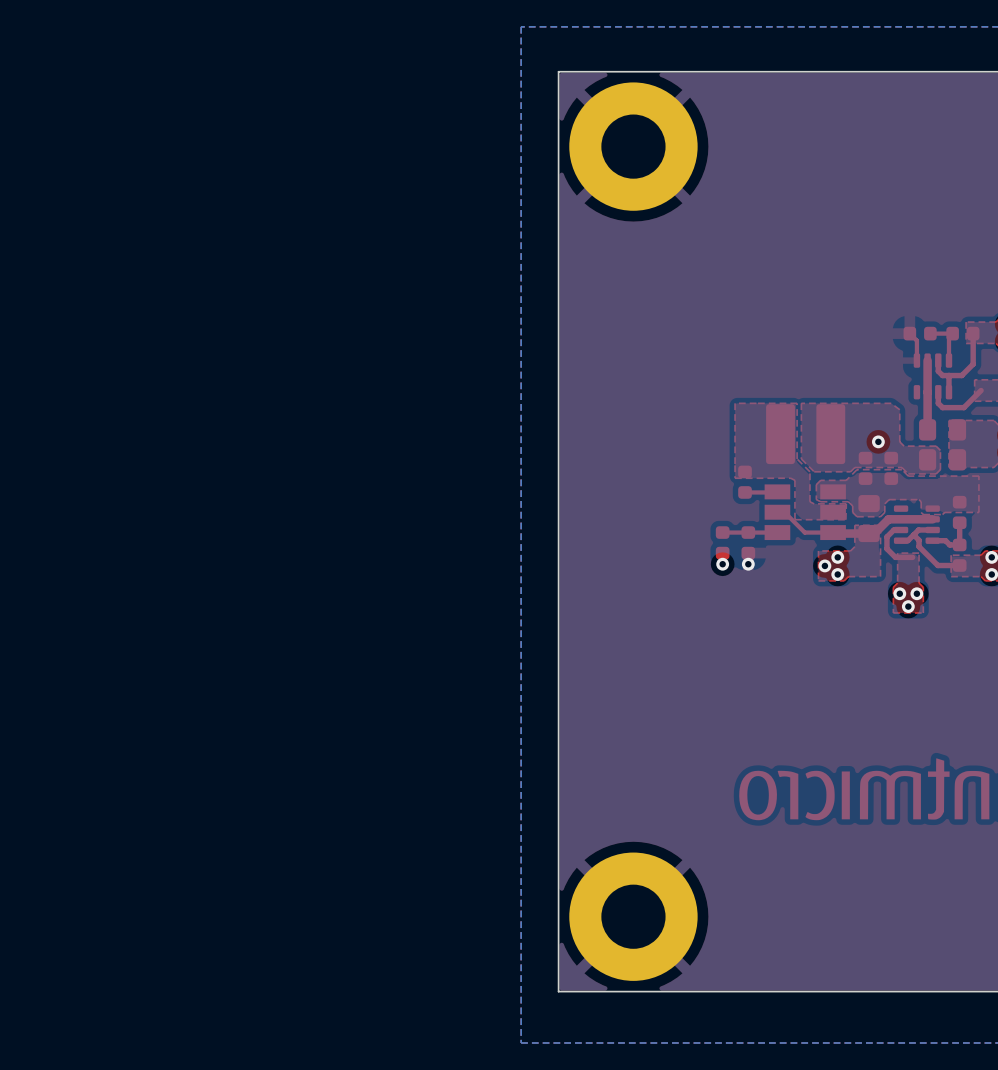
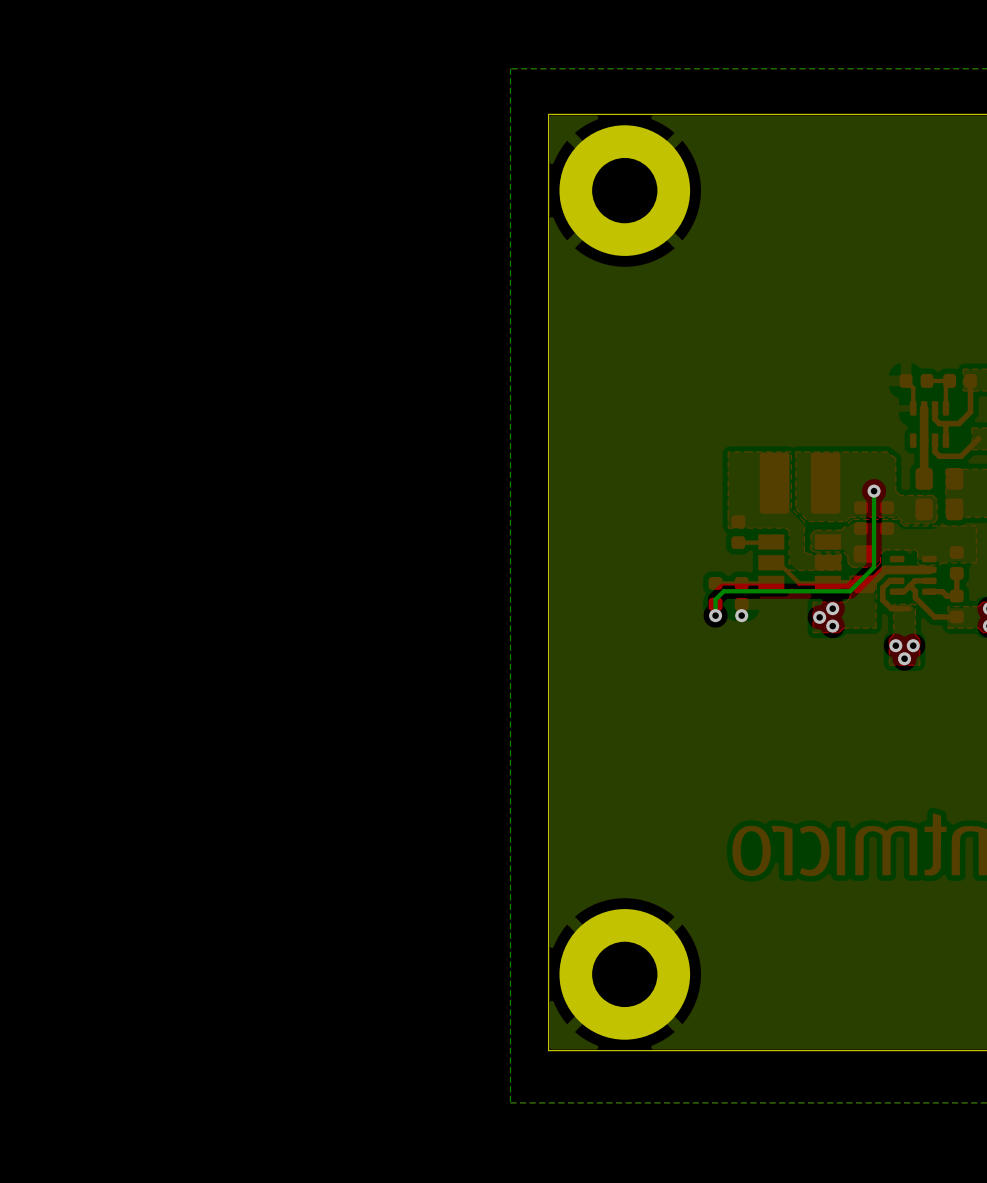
bottom track: none -> (874, 491) (874, 567) (850, 591) (723, 591) (715, 599) (715, 615)

